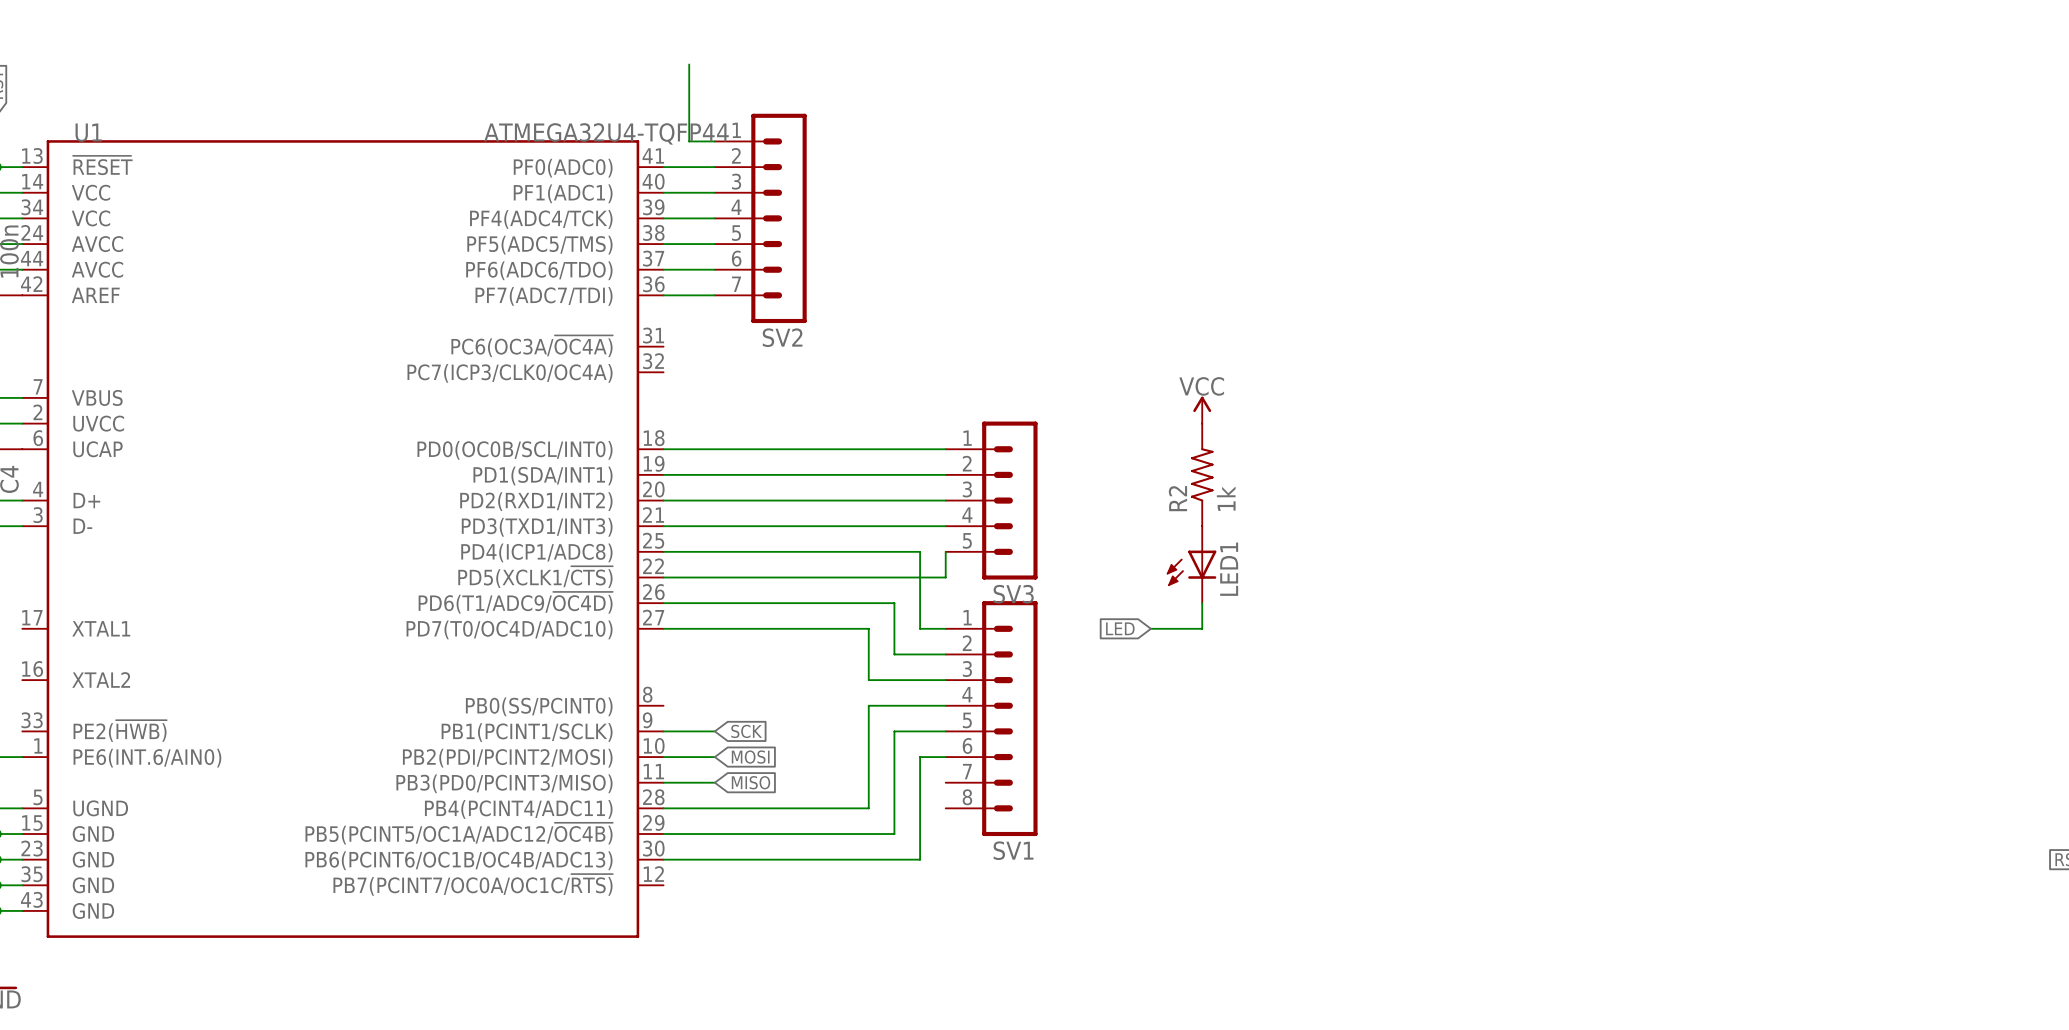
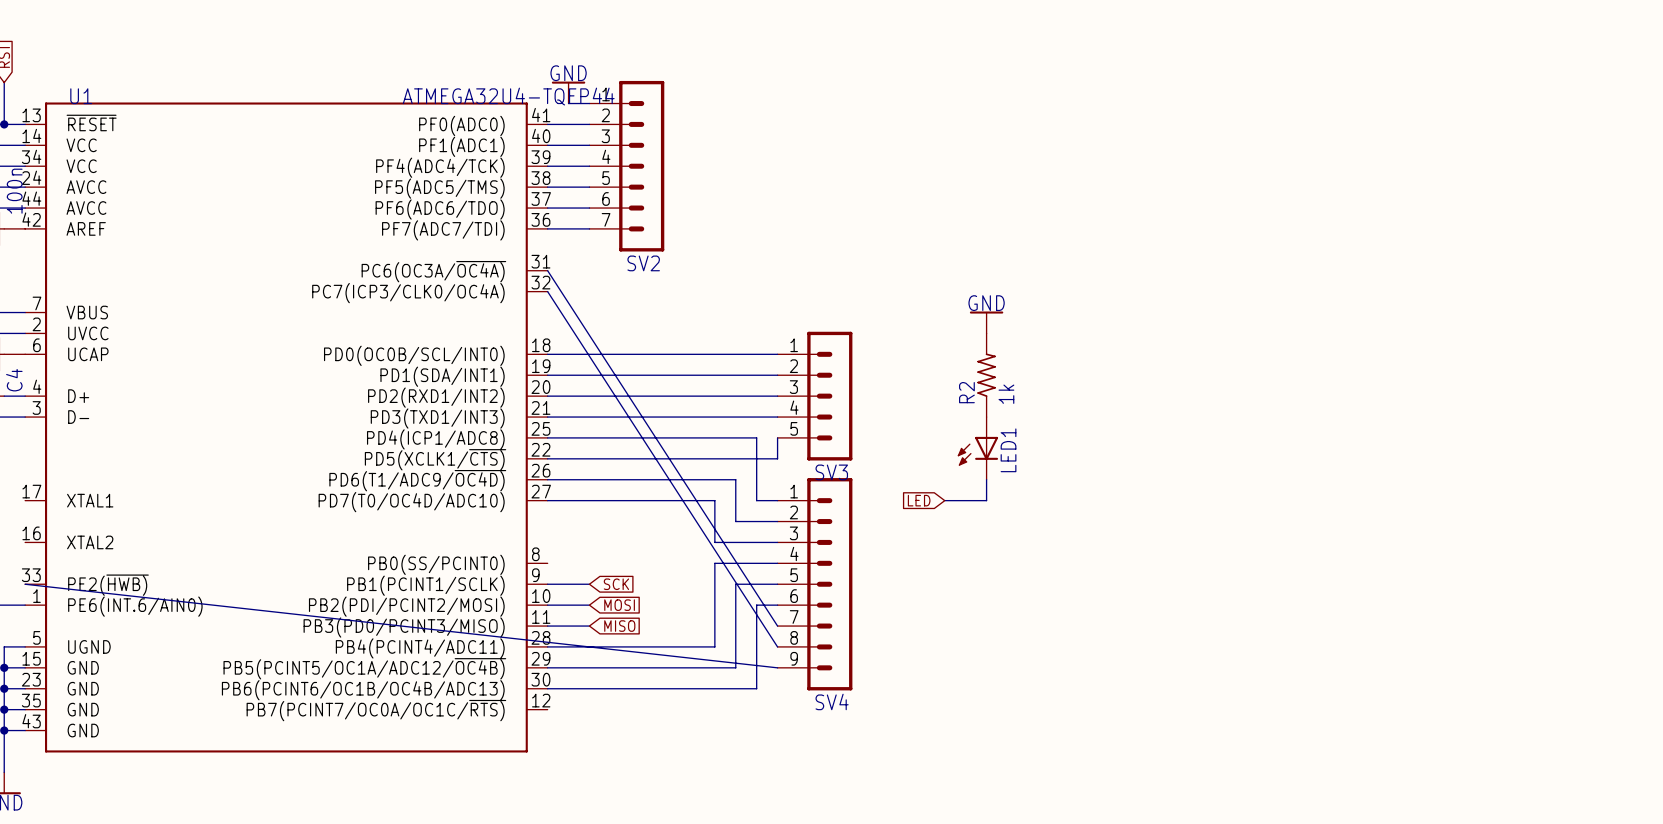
wire: (689, 64) (689, 141) -> none
power symbol: none -> GND (568, 92)
wire: none -> (547, 270) (777, 626)
wire: none -> (547, 291) (777, 646)
power symbol: VCC (1202, 410) -> GND (986, 322)
SV1: (991, 718) -> none
wire: none -> (25, 584) (777, 667)
SV4: none -> (814, 584)

